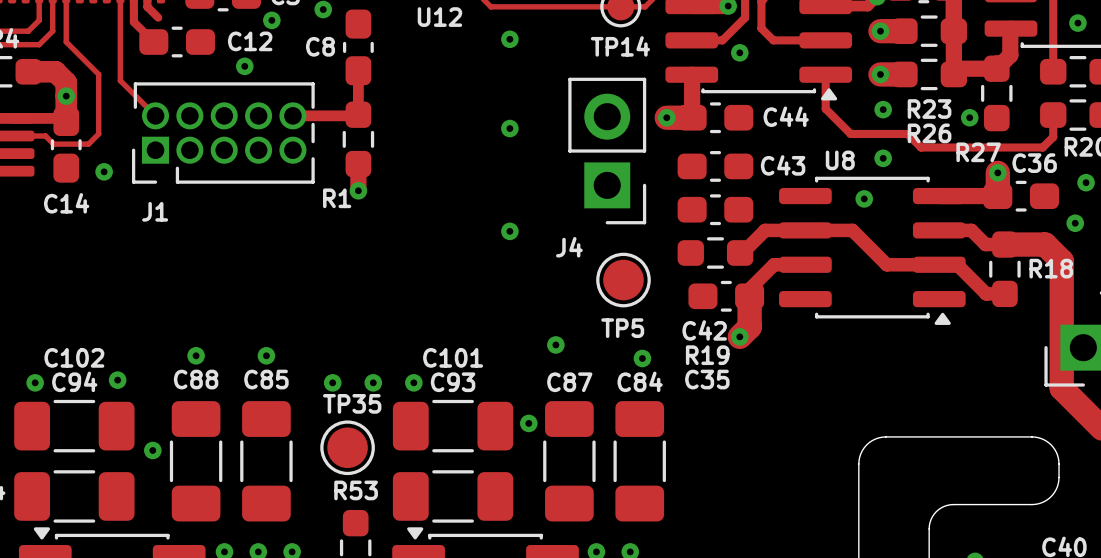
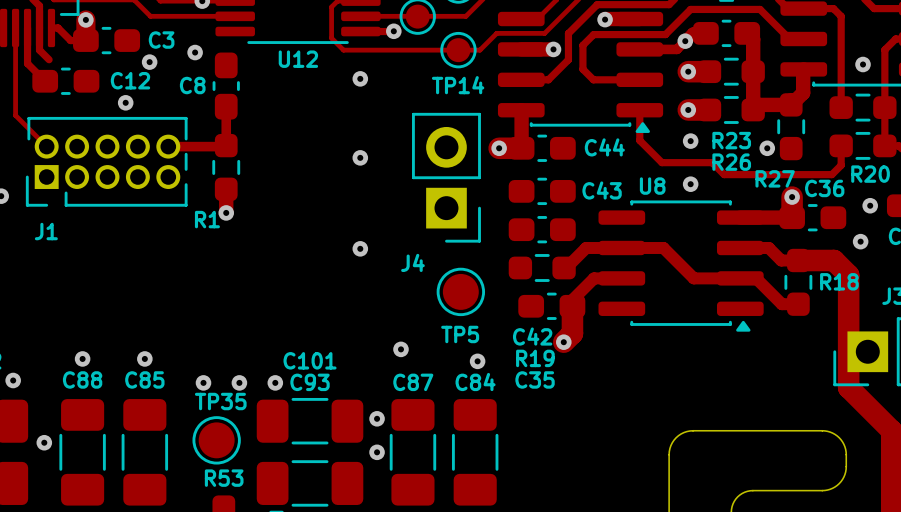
via: (739, 52) -> none
via: (864, 198) -> none
via: none -> (377, 452)

